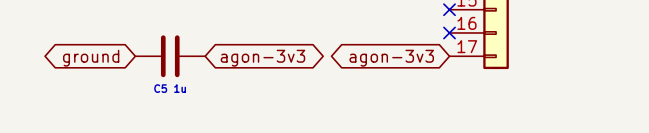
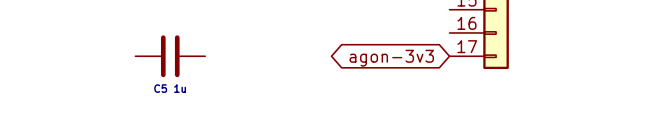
no-connect mark: (449, 9) -> none
no-connect mark: (449, 32) -> none
global label: ground (91, 58) -> none
global label: agon-3v3 (262, 58) -> none

